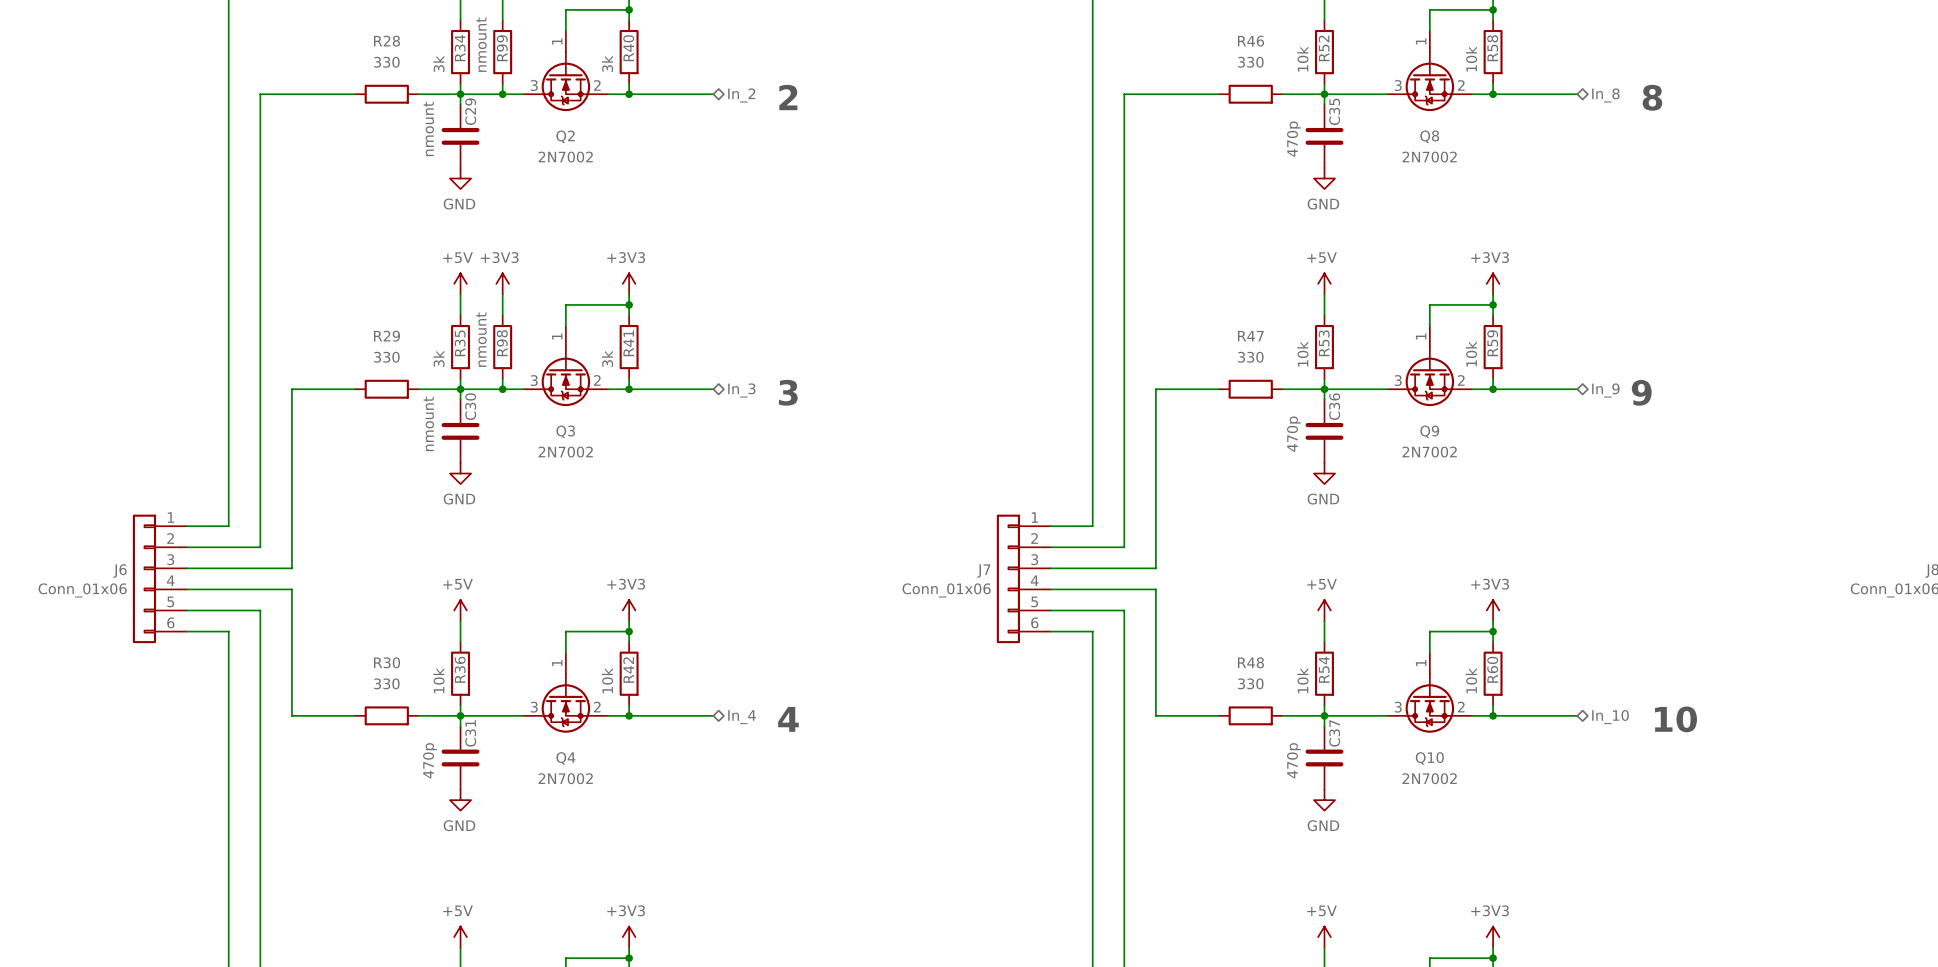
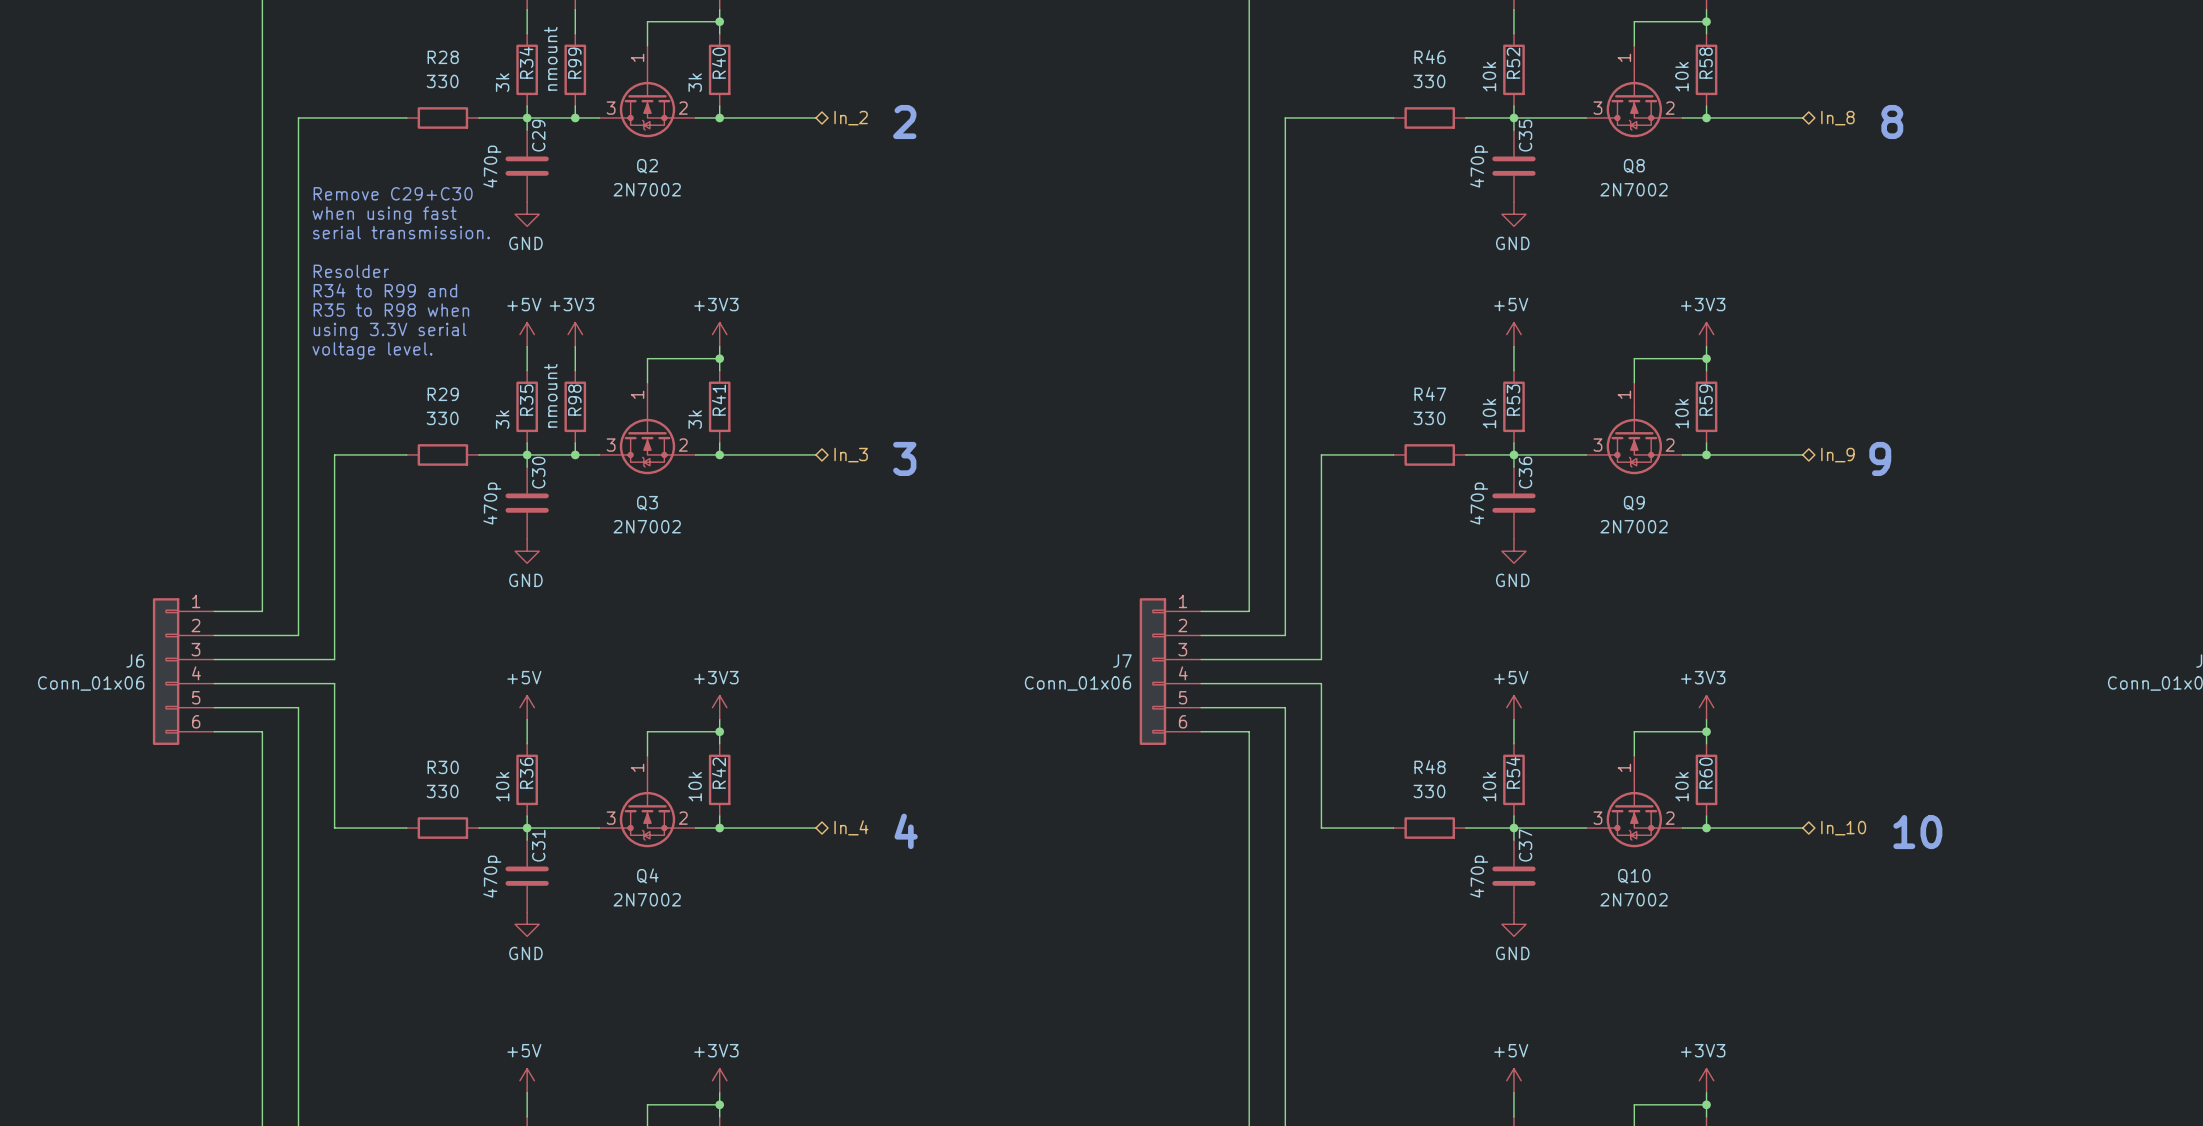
C29 value: nmount (428, 128) -> 470p (492, 166)
text: none -> Remove C29+C30 (393, 193)
text: none -> when using fast (384, 215)
text: none -> serial transmission. (401, 232)
text: none -> Resolder (351, 271)
text: none -> R34 to R99 and (385, 290)
text: none -> R35 to R98 when (391, 310)
text: none -> using 3.3V serial (389, 331)
text: none -> voltage level. (372, 350)
C30 value: nmount (428, 423) -> 470p (492, 503)

